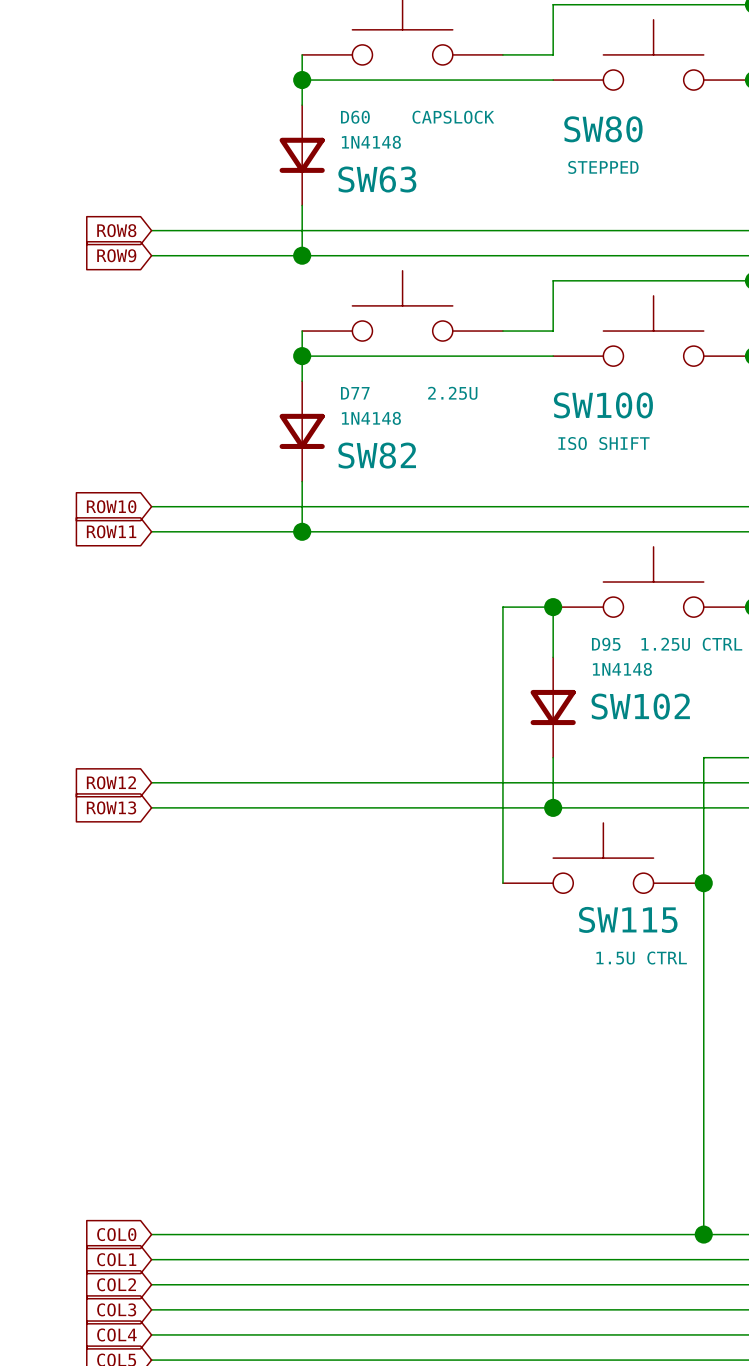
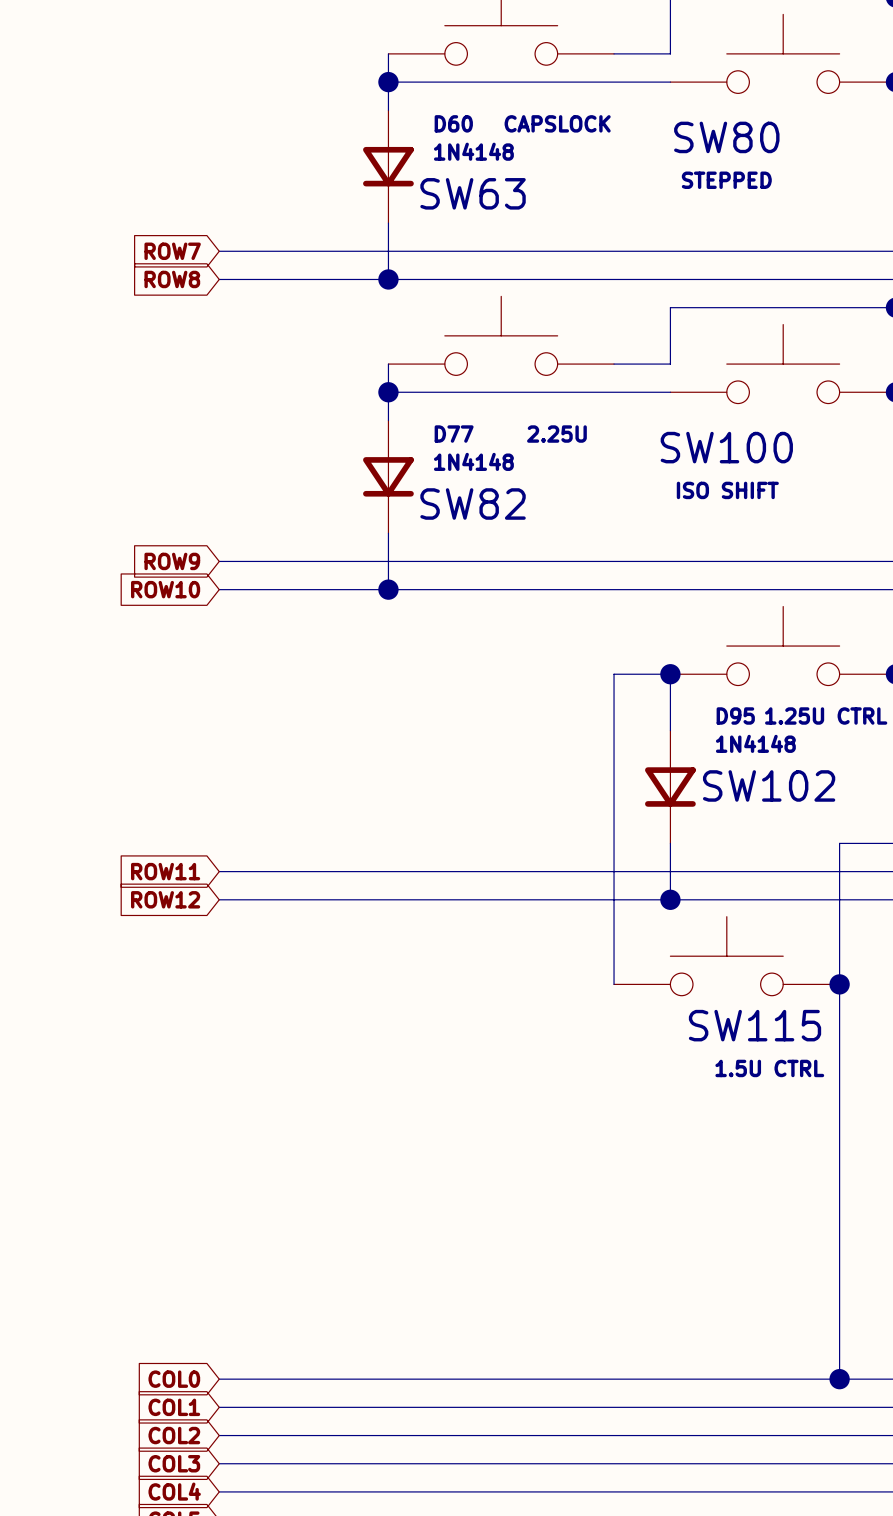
global label: ROW8 (116, 230) -> ROW7 (172, 251)
global label: ROW9 (116, 255) -> ROW8 (172, 279)
global label: ROW10 (111, 506) -> ROW9 (172, 561)
global label: ROW11 (111, 531) -> ROW10 (165, 589)
global label: ROW12 (111, 782) -> ROW11 (165, 871)
global label: ROW13 (111, 807) -> ROW12 (165, 899)

